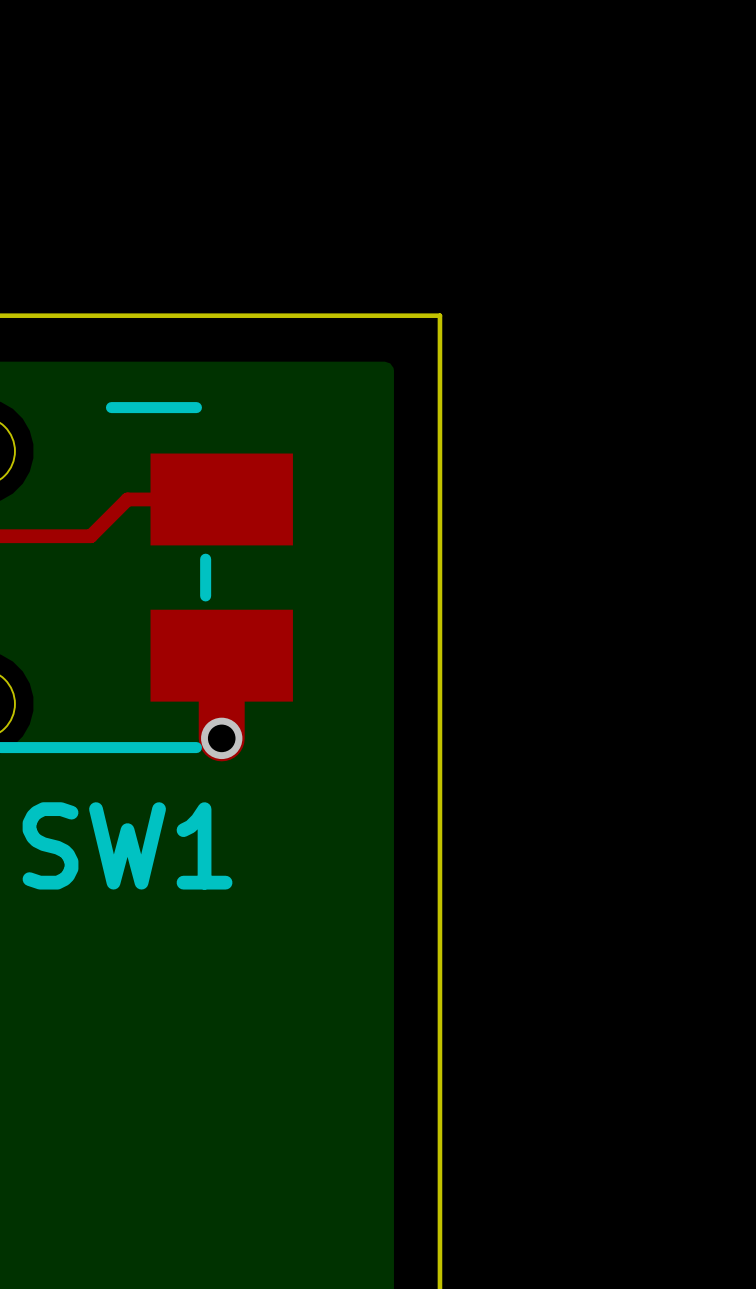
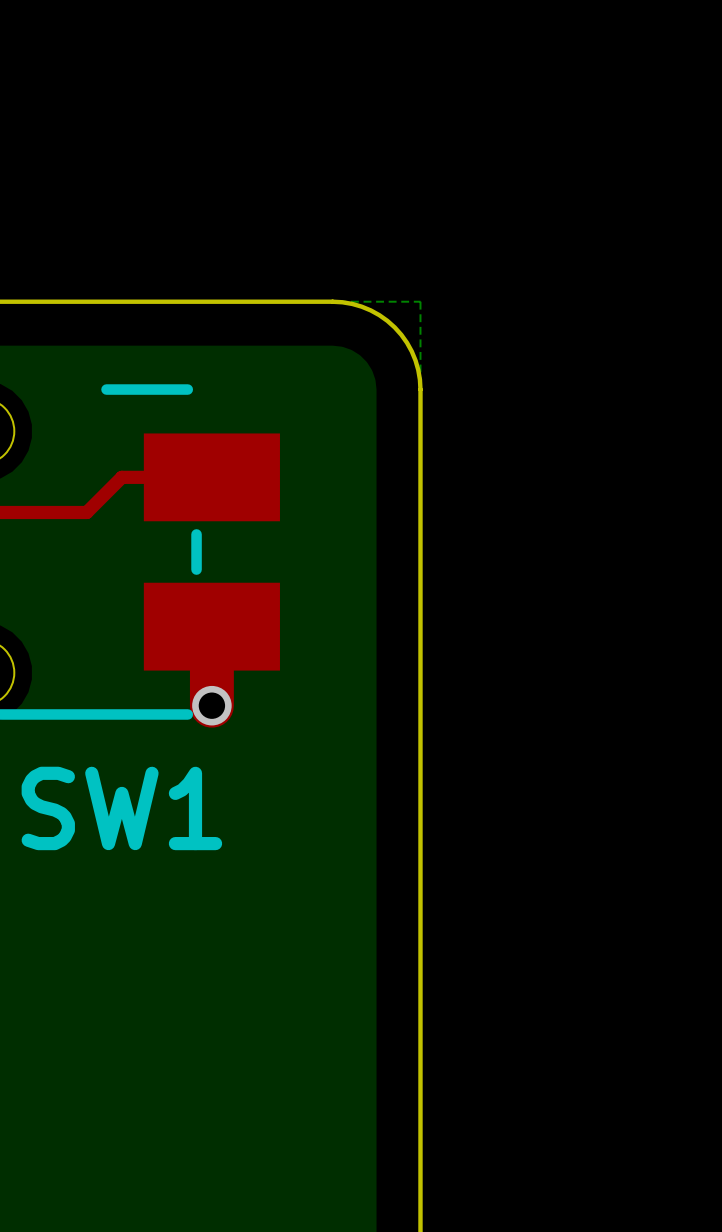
board edge: (348, 315) (439, 315) (439, 407) -> (332, 301) (361, 306) (379, 315) (394, 327) (411, 351) (418, 369) (420, 389)

